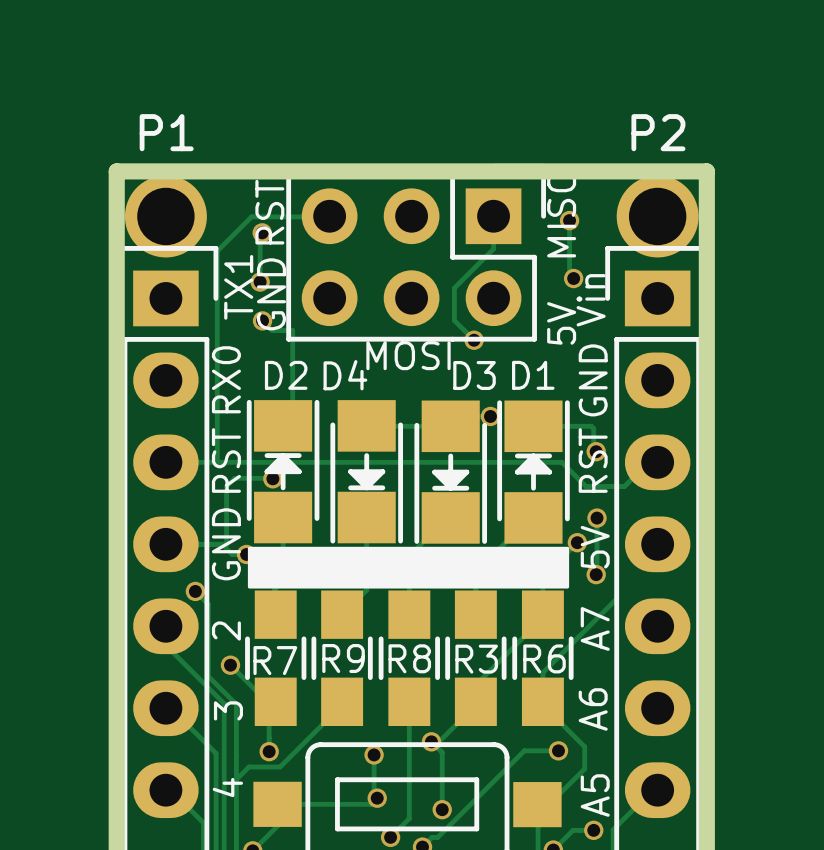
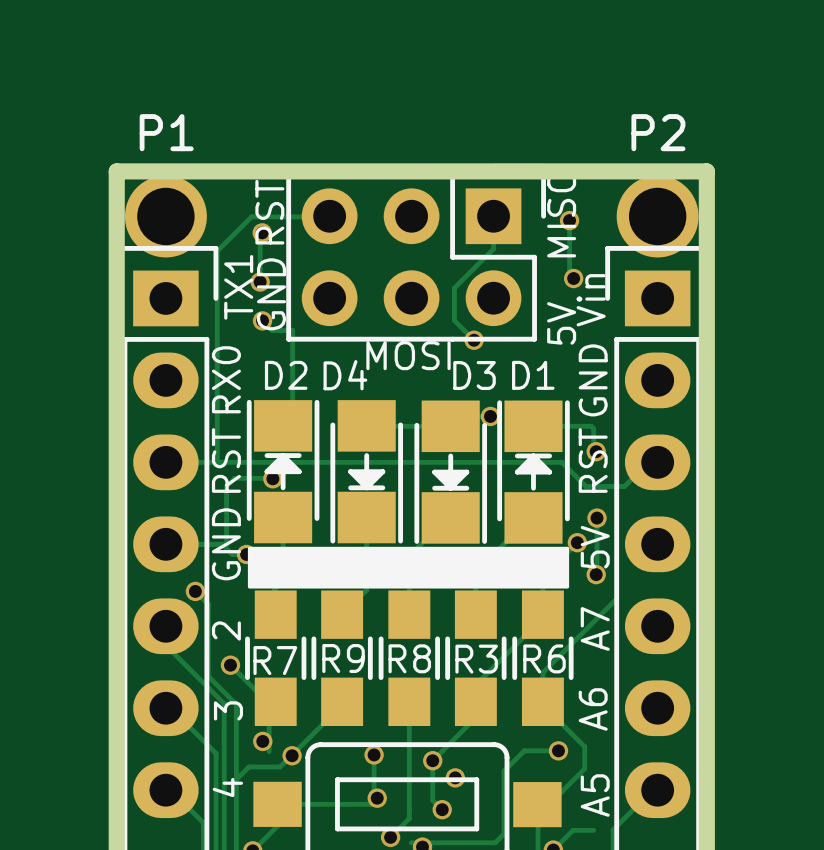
track: (475, 705) (439, 741) (431, 741) (442, 752) (442, 809) -> (475, 705) (475, 717) (432, 760) (432, 800) (442, 809)
via position: (431, 741) -> (432, 760)
via position: (269, 751) -> (262, 741)
via: none -> (292, 755)
track: (503, 771) (437, 837) (432, 837) (422, 847) -> (503, 771) (503, 834) (495, 842) (411, 842)
via: none -> (455, 777)
via: (593, 830) -> none

